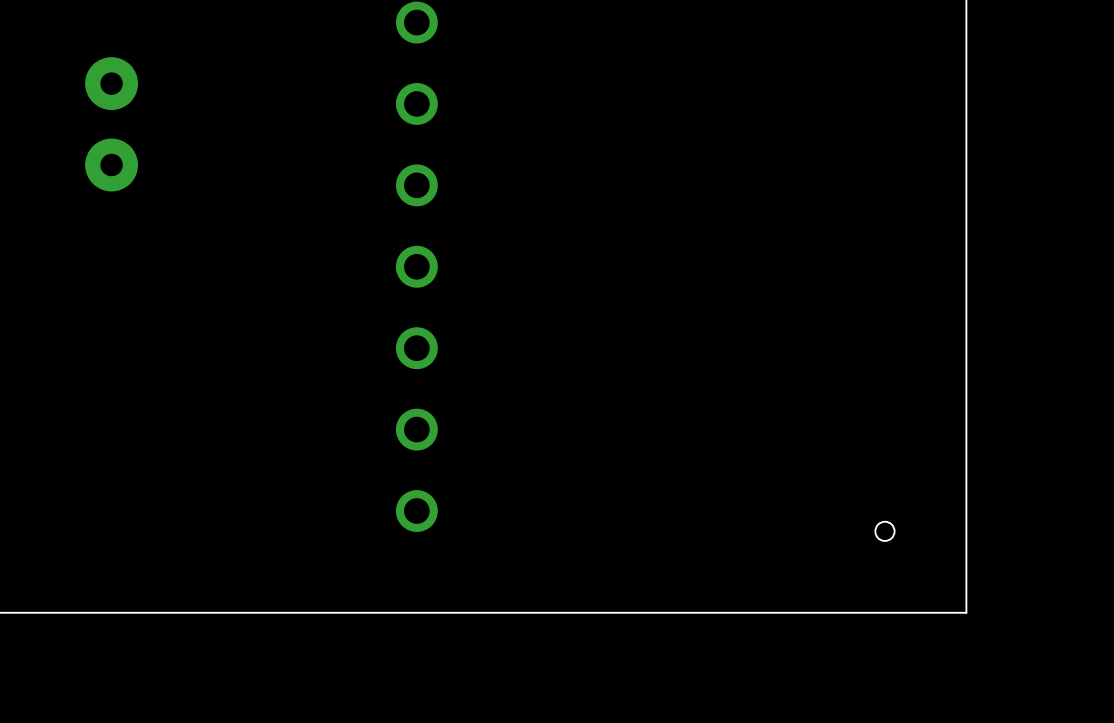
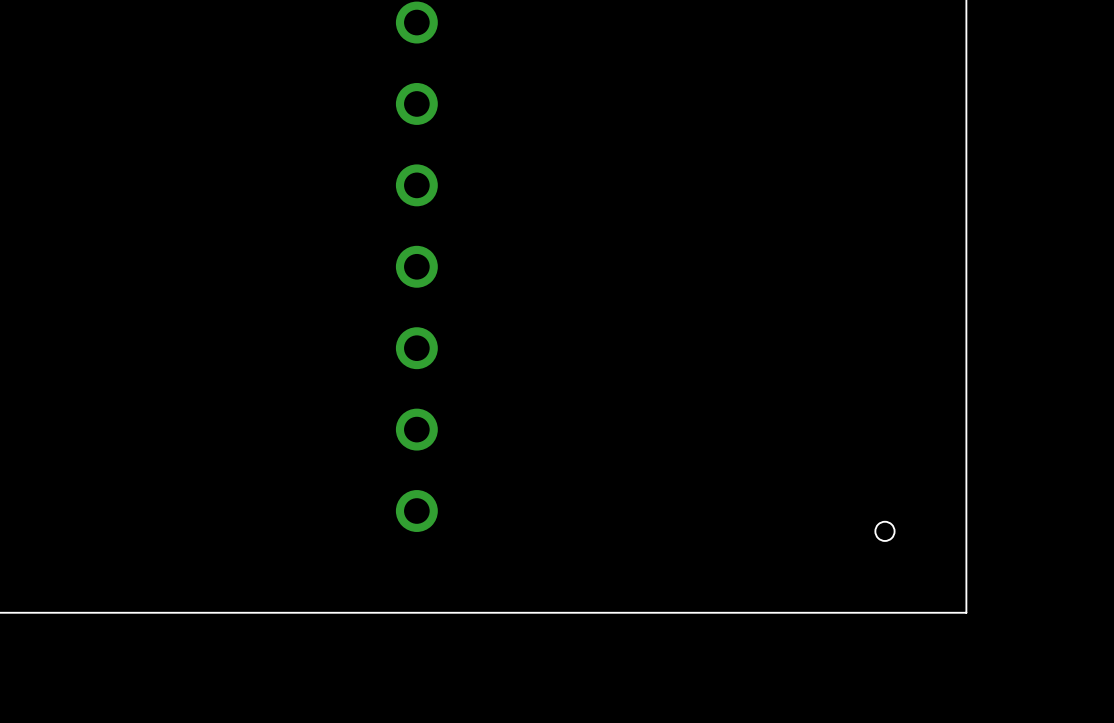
part: (111, 124) -> none

